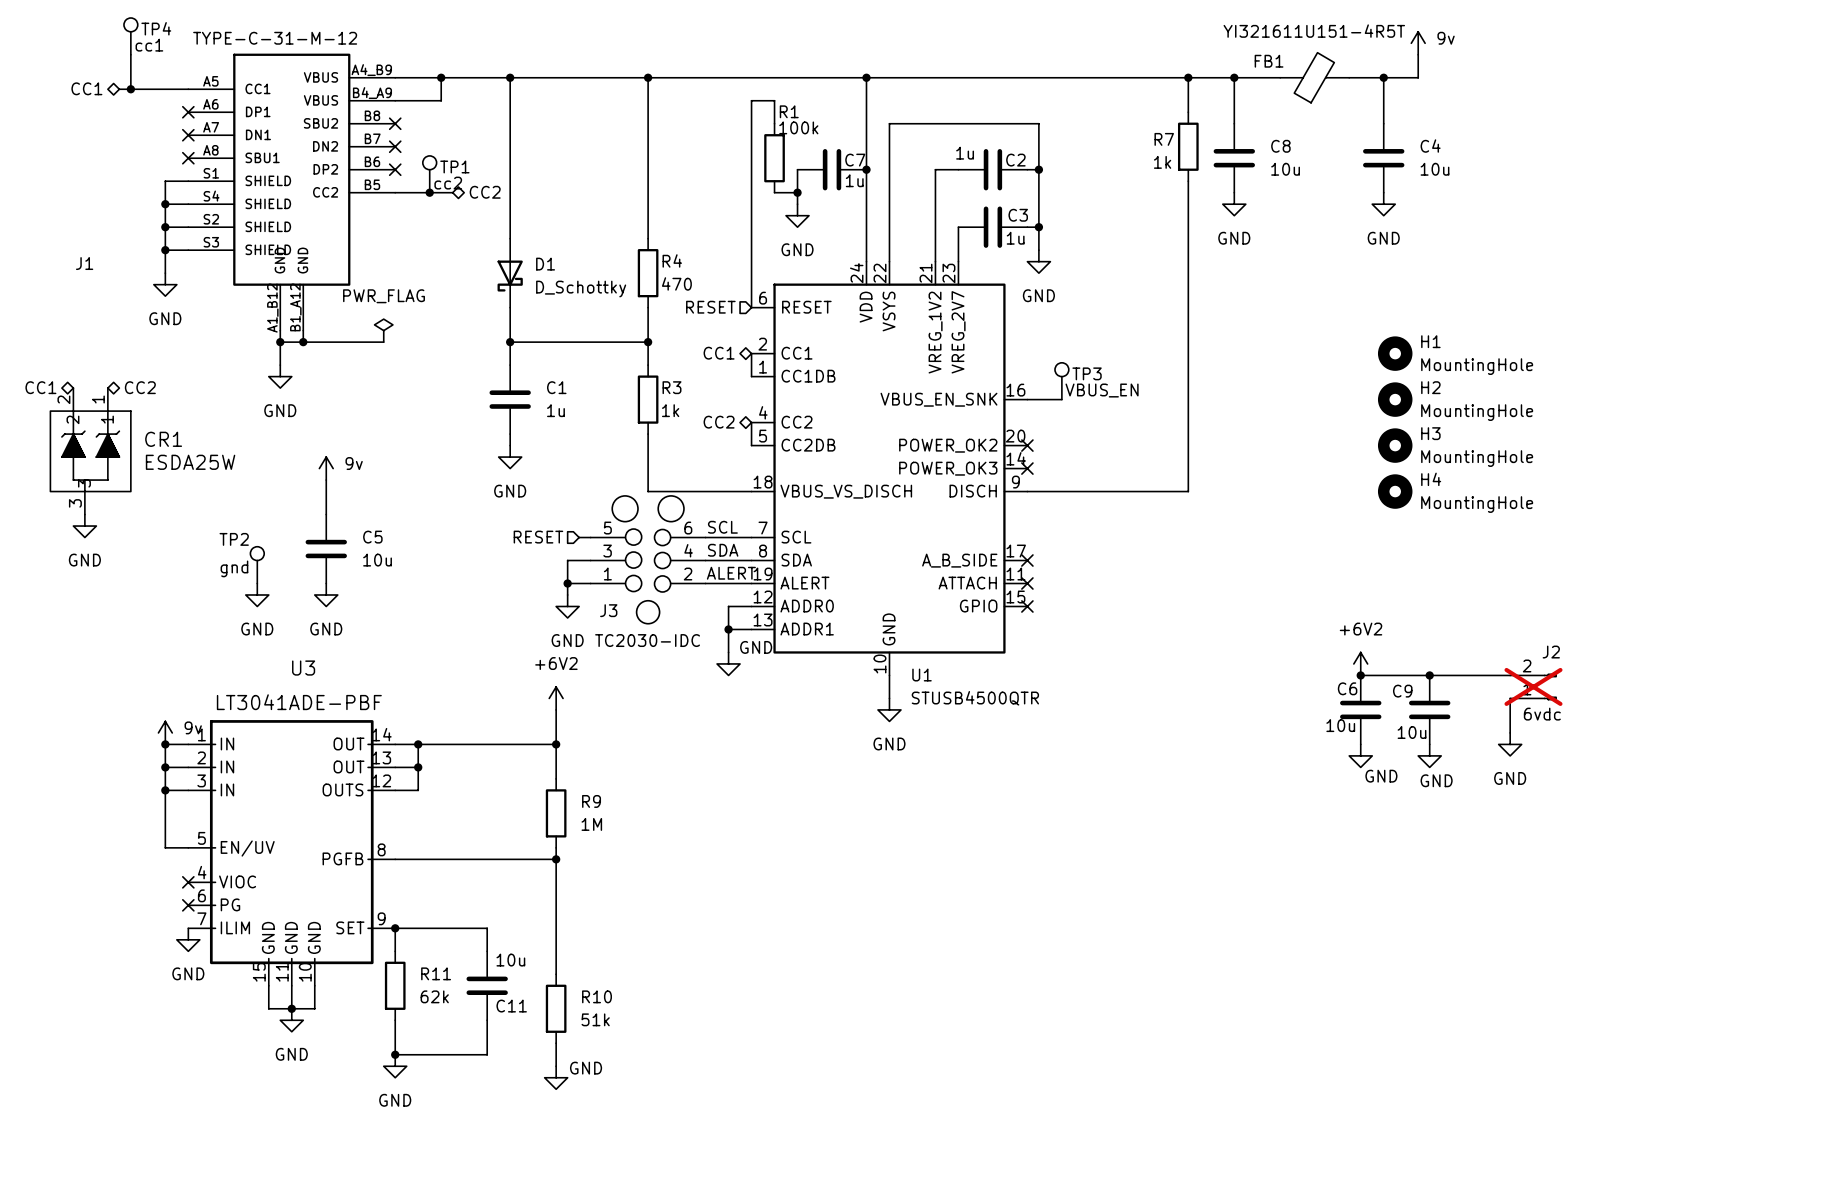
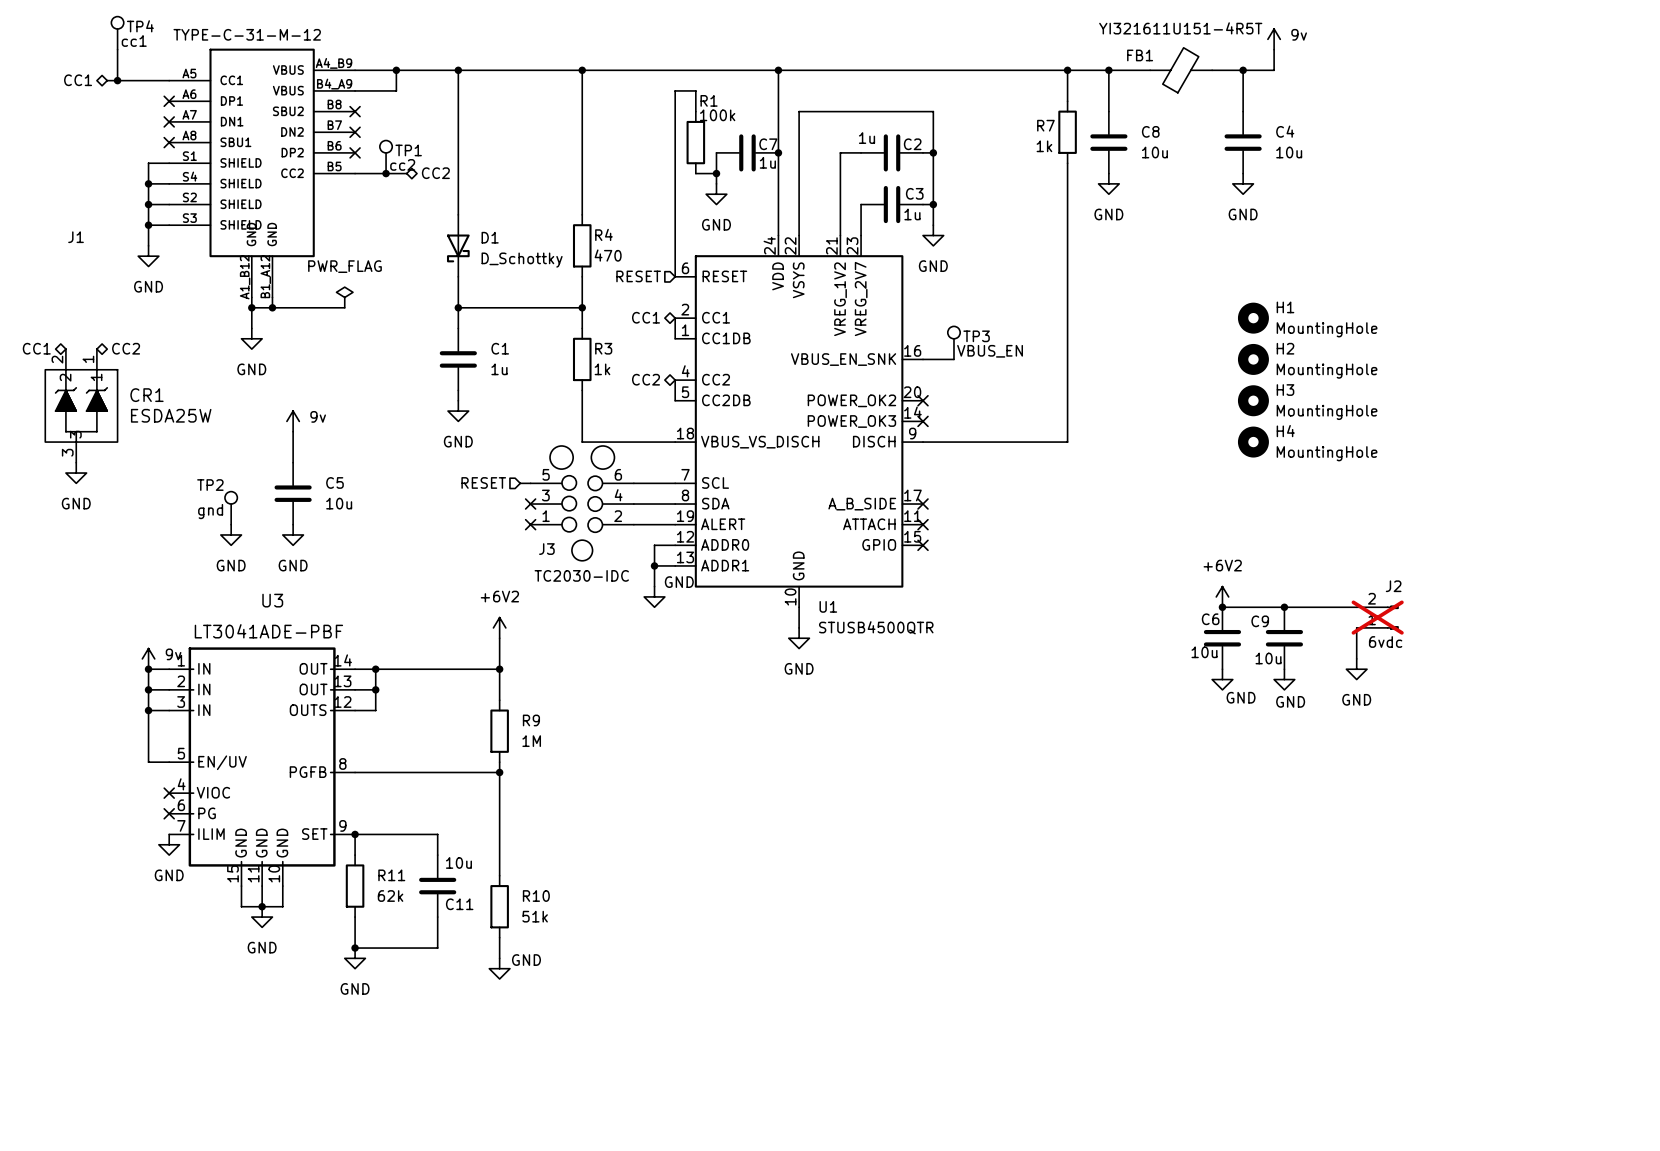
label: SCL (722, 527) -> none
label: SDA (723, 550) -> none
wire: (590, 560) (567, 560) (567, 594) -> none
no-connect mark: none -> (530, 504)
label: ALERT (731, 573) -> none
wire: (567, 583) (590, 583) -> none
junction: (567, 583) -> none
no-connect mark: none -> (530, 524)
power symbol: GND (567, 606) -> none

